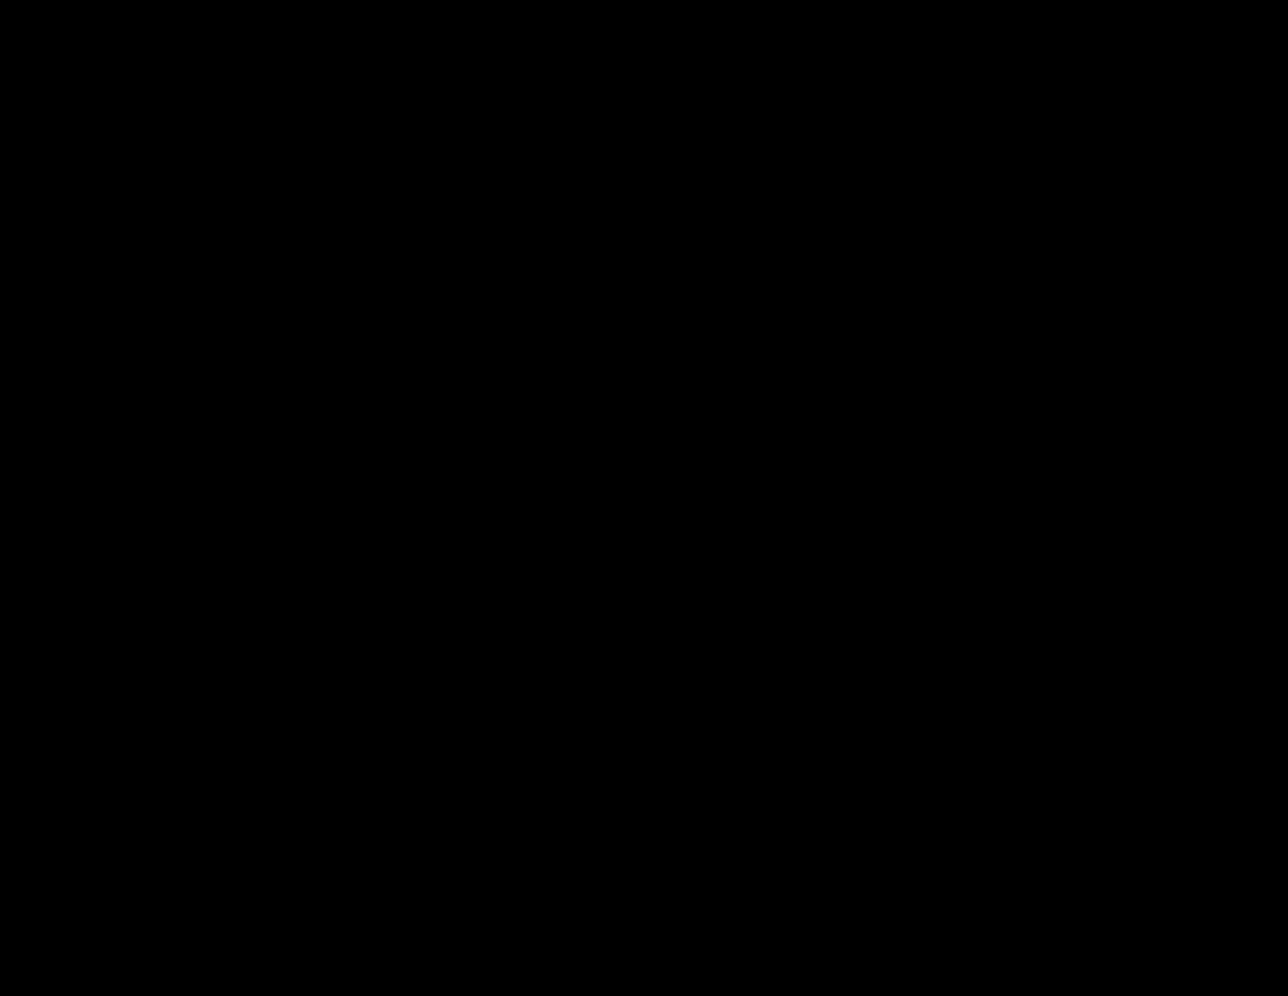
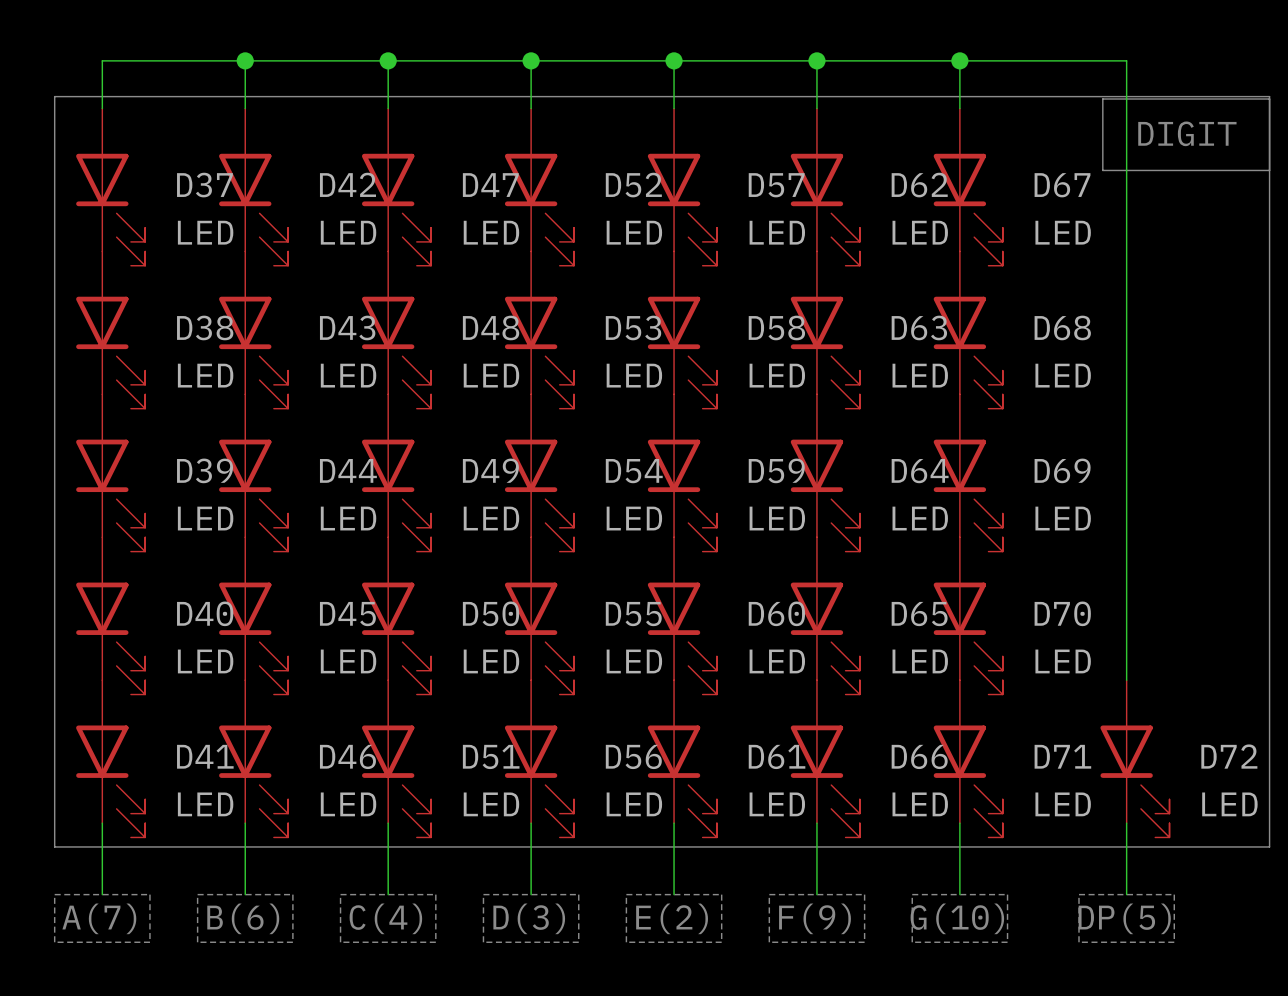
wire: none -> (245, 60) (245, 108)
junction: none -> (245, 60)
wire: none -> (388, 60) (388, 108)
junction: none -> (388, 60)
wire: none -> (531, 60) (531, 108)
junction: none -> (531, 60)
wire: none -> (674, 60) (674, 108)
junction: none -> (674, 60)
wire: none -> (816, 60) (816, 108)
junction: none -> (816, 60)
wire: none -> (959, 60) (959, 108)
junction: none -> (959, 60)
line: none -> (54, 96) (1269, 96) (1269, 846) (54, 846) (54, 96)
line: none -> (1269, 98) (1102, 98) (1102, 170) (1269, 170)
wire: none -> (102, 108) (102, 60) (1126, 60) (1126, 680)
text: none -> DIGIT (1187, 133)
D37: none -> LED (110, 187)
D42: none -> LED (253, 187)
D47: none -> LED (396, 187)
D52: none -> LED (539, 187)
D57: none -> LED (682, 187)
D62: none -> LED (825, 187)
D67: none -> LED (968, 187)
D38: none -> LED (110, 330)
D43: none -> LED (253, 330)
D48: none -> LED (396, 330)
D53: none -> LED (539, 330)
D58: none -> LED (682, 330)
D63: none -> LED (825, 330)
D68: none -> LED (968, 330)
D39: none -> LED (110, 472)
D44: none -> LED (253, 472)
D49: none -> LED (396, 472)
D54: none -> LED (539, 472)
D59: none -> LED (682, 472)
D64: none -> LED (825, 472)
D69: none -> LED (968, 472)
D40: none -> LED (110, 615)
D45: none -> LED (253, 615)
D50: none -> LED (396, 615)
D55: none -> LED (539, 615)
D60: none -> LED (682, 615)
D65: none -> LED (825, 615)
D70: none -> LED (968, 615)
D41: none -> LED (110, 758)
D46: none -> LED (253, 758)
D51: none -> LED (396, 758)
D56: none -> LED (539, 758)
D61: none -> LED (682, 758)
D66: none -> LED (825, 758)
D71: none -> LED (968, 758)
D72: none -> LED (1134, 758)
wire: none -> (102, 823) (102, 894)
wire: none -> (245, 823) (245, 894)
wire: none -> (388, 823) (388, 894)
wire: none -> (531, 823) (531, 894)
wire: none -> (674, 823) (674, 894)
wire: none -> (816, 823) (816, 894)
wire: none -> (959, 823) (959, 894)
wire: none -> (1126, 823) (1126, 894)
line: none -> (54, 894) (149, 894) (149, 942) (54, 942) (54, 894)
line: none -> (197, 894) (292, 894) (292, 942) (197, 942) (197, 894)
line: none -> (340, 894) (435, 894) (435, 942) (340, 942) (340, 894)
line: none -> (483, 894) (578, 894) (578, 942) (483, 942) (483, 894)
line: none -> (626, 894) (721, 894) (721, 942) (626, 942) (626, 894)
line: none -> (769, 894) (864, 894) (864, 942) (769, 942) (769, 894)
line: none -> (912, 894) (1007, 894) (1007, 942) (912, 942) (912, 894)
line: none -> (1078, 894) (1174, 894) (1174, 942) (1078, 942) (1078, 894)
text: none -> A(7) (99, 918)
text: none -> B(6) (243, 918)
text: none -> C(4) (385, 918)
text: none -> D(3) (529, 918)
text: none -> E(2) (672, 918)
text: none -> F(9) (815, 918)
text: none -> G(10) (957, 918)
text: none -> DP(5) (1124, 918)

